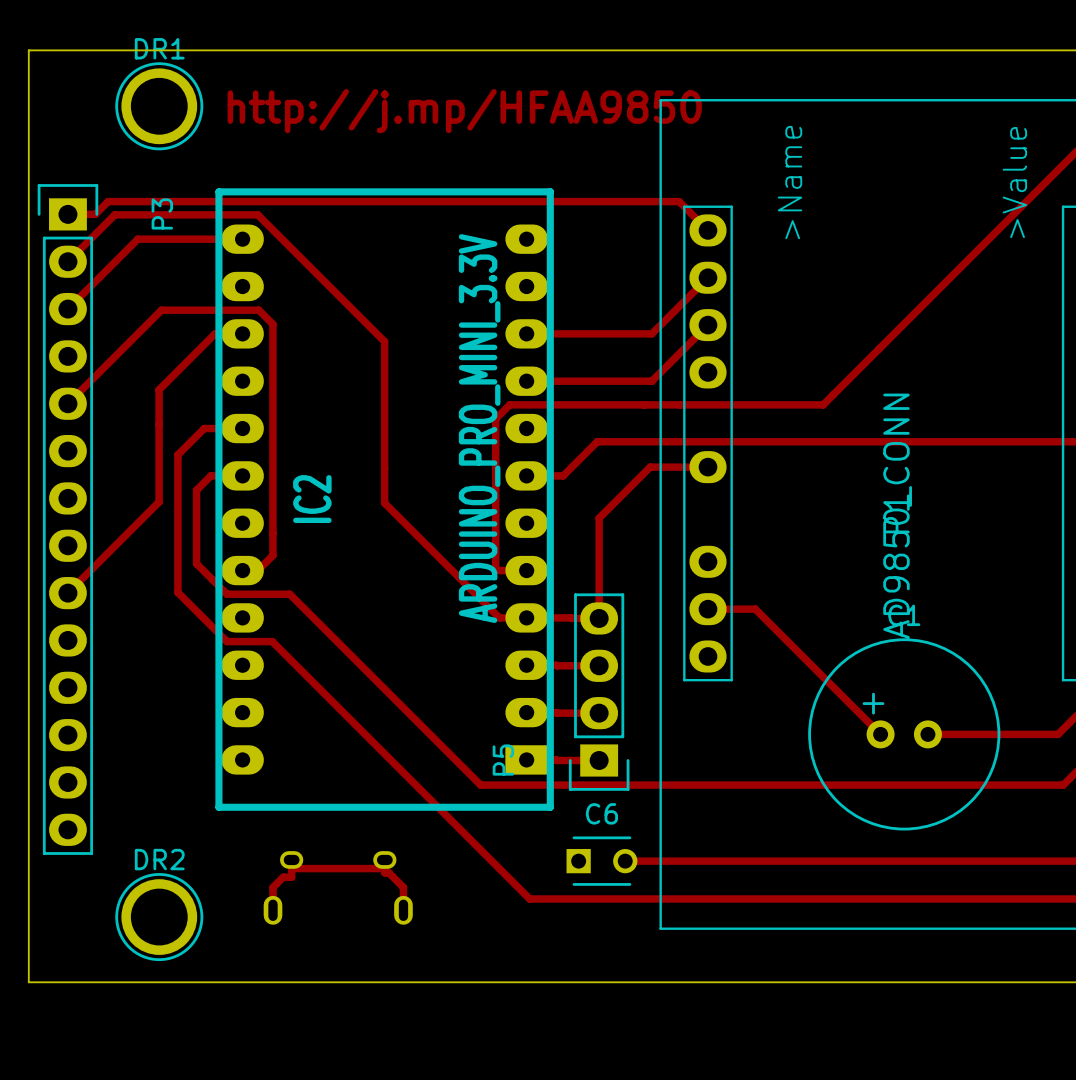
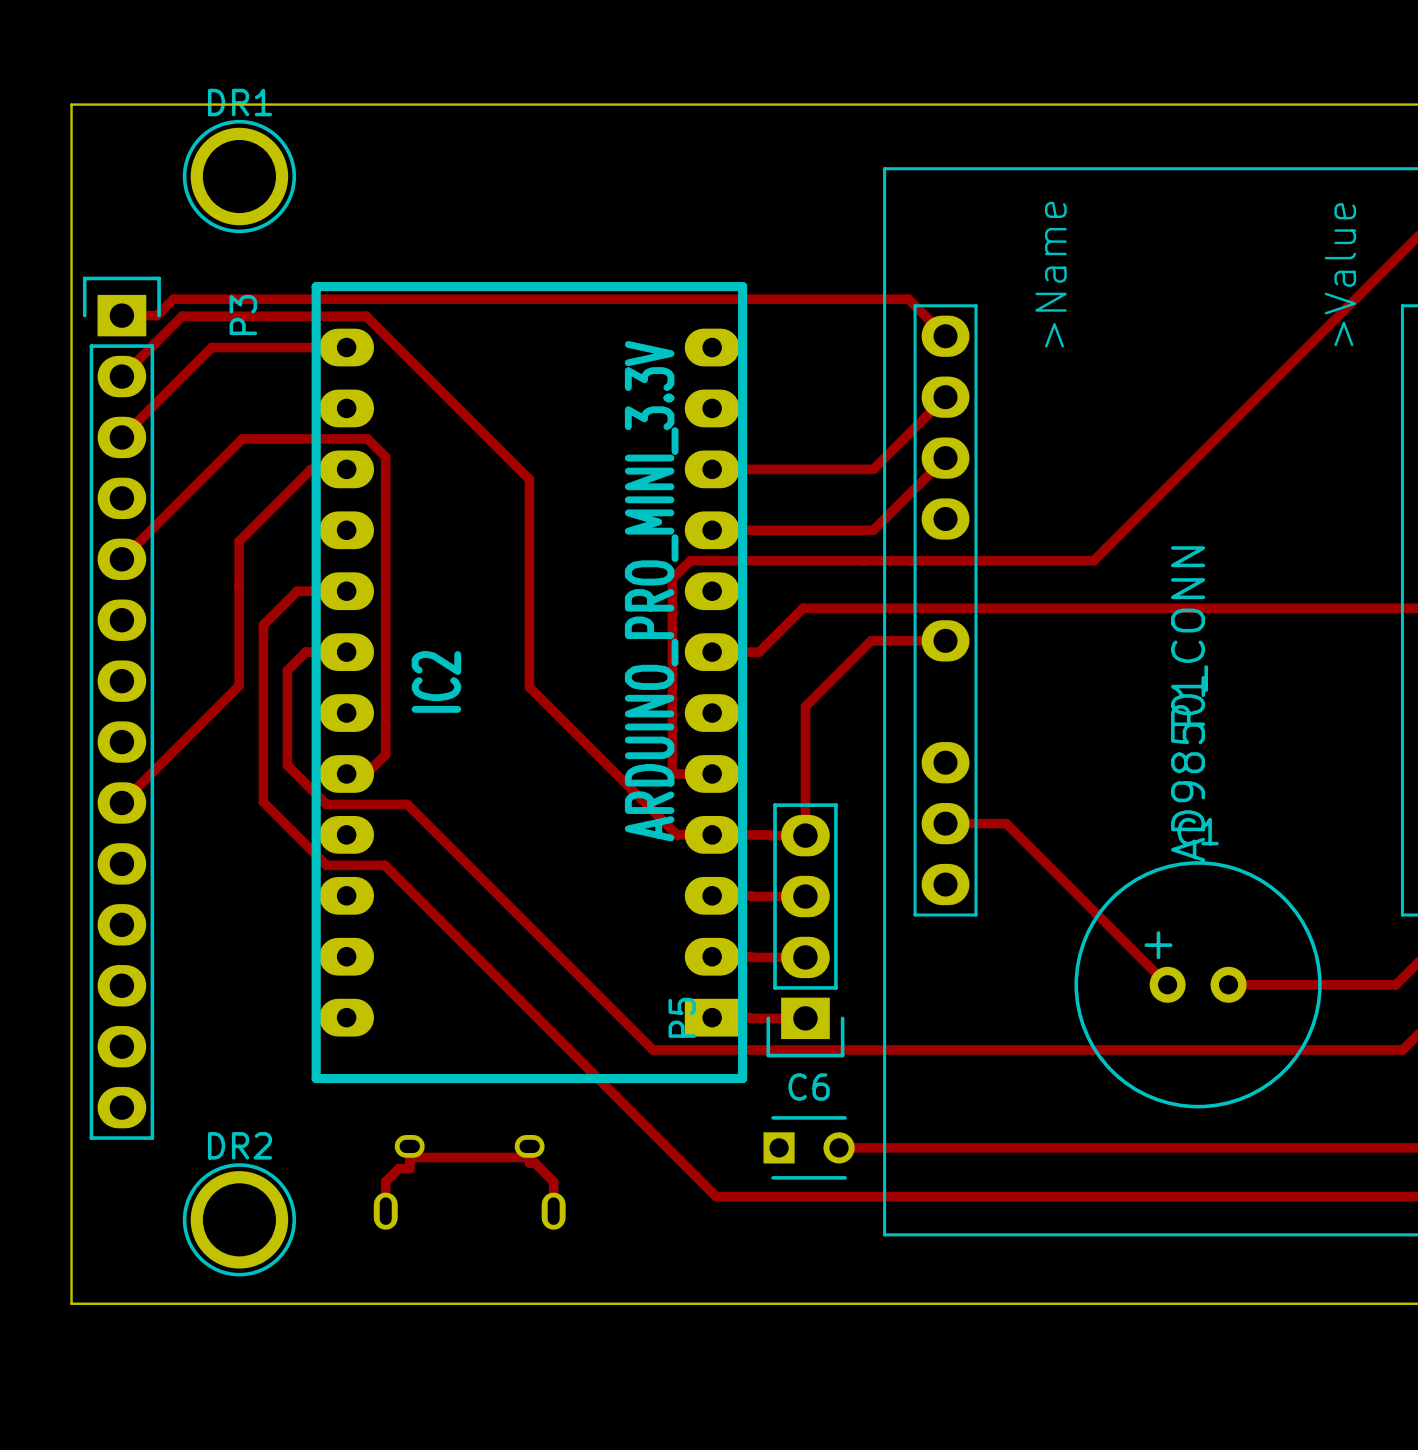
text: http://j.mp/HFAA9850 (464, 111) -> none

